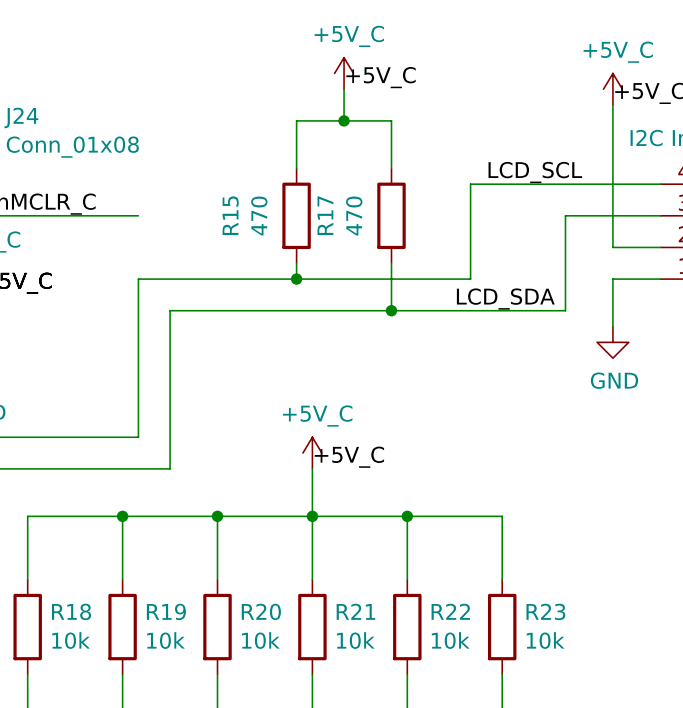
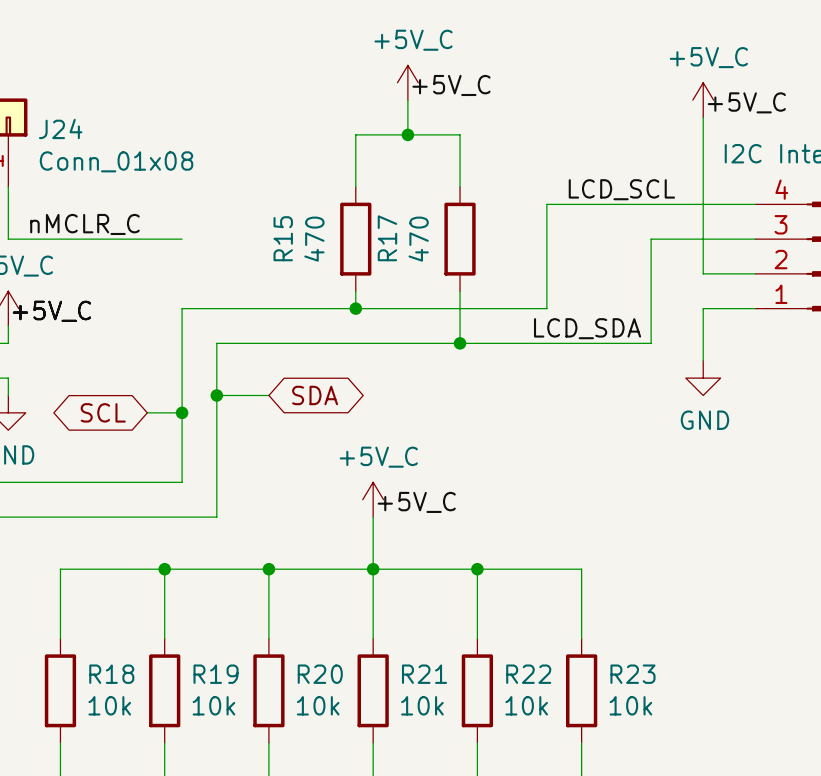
wire: none -> (216, 395) (268, 395)
junction: none -> (216, 395)
global label: none -> SDA (315, 395)
wire: none -> (147, 412) (182, 412)
junction: none -> (182, 412)
global label: none -> SCL (103, 412)

